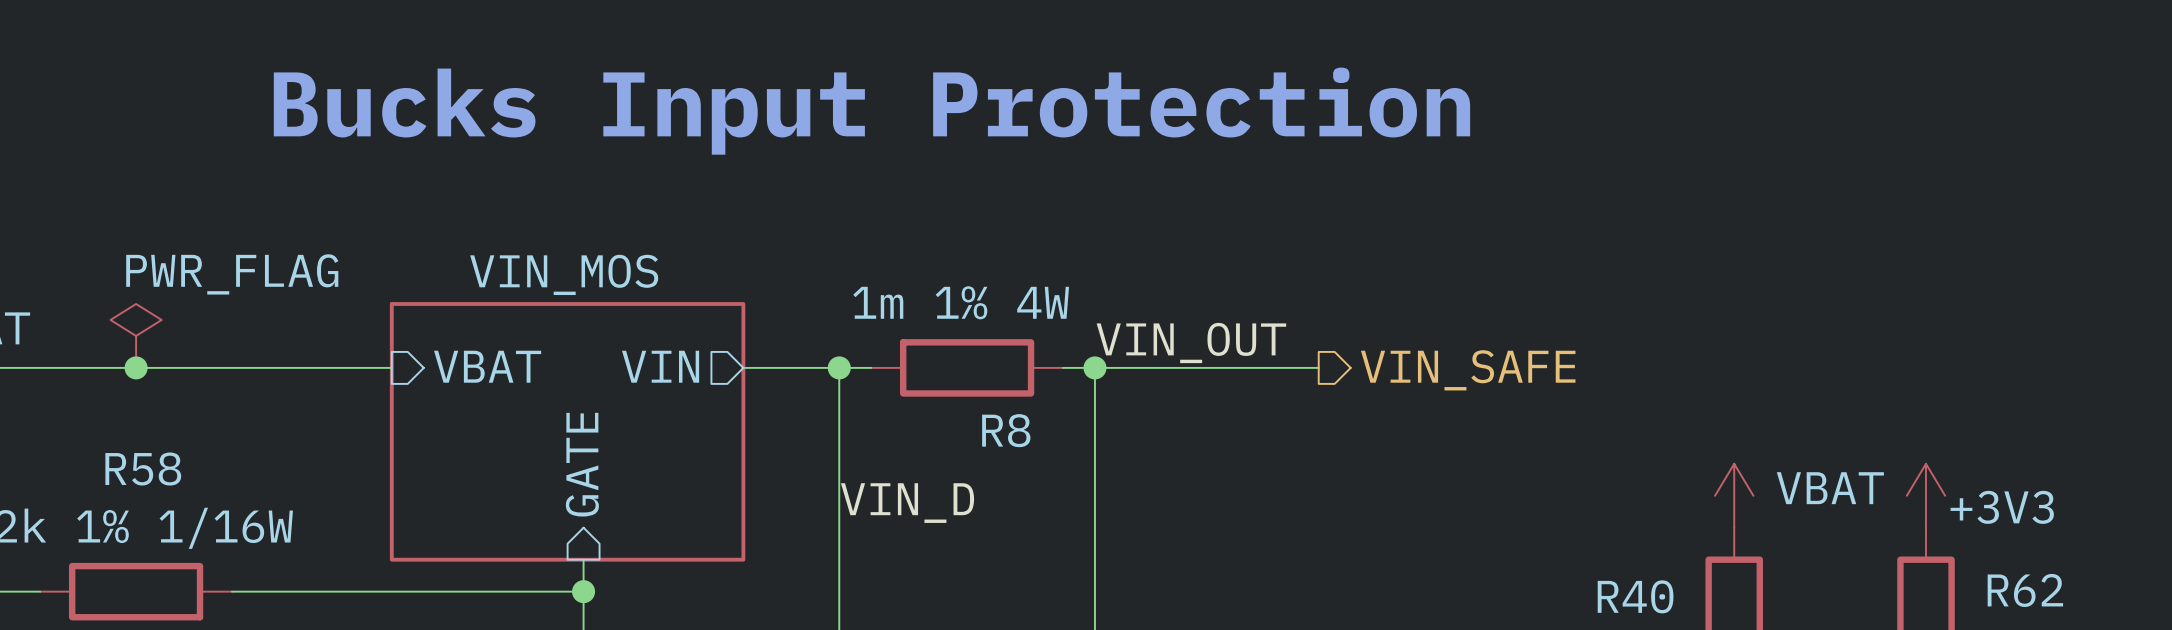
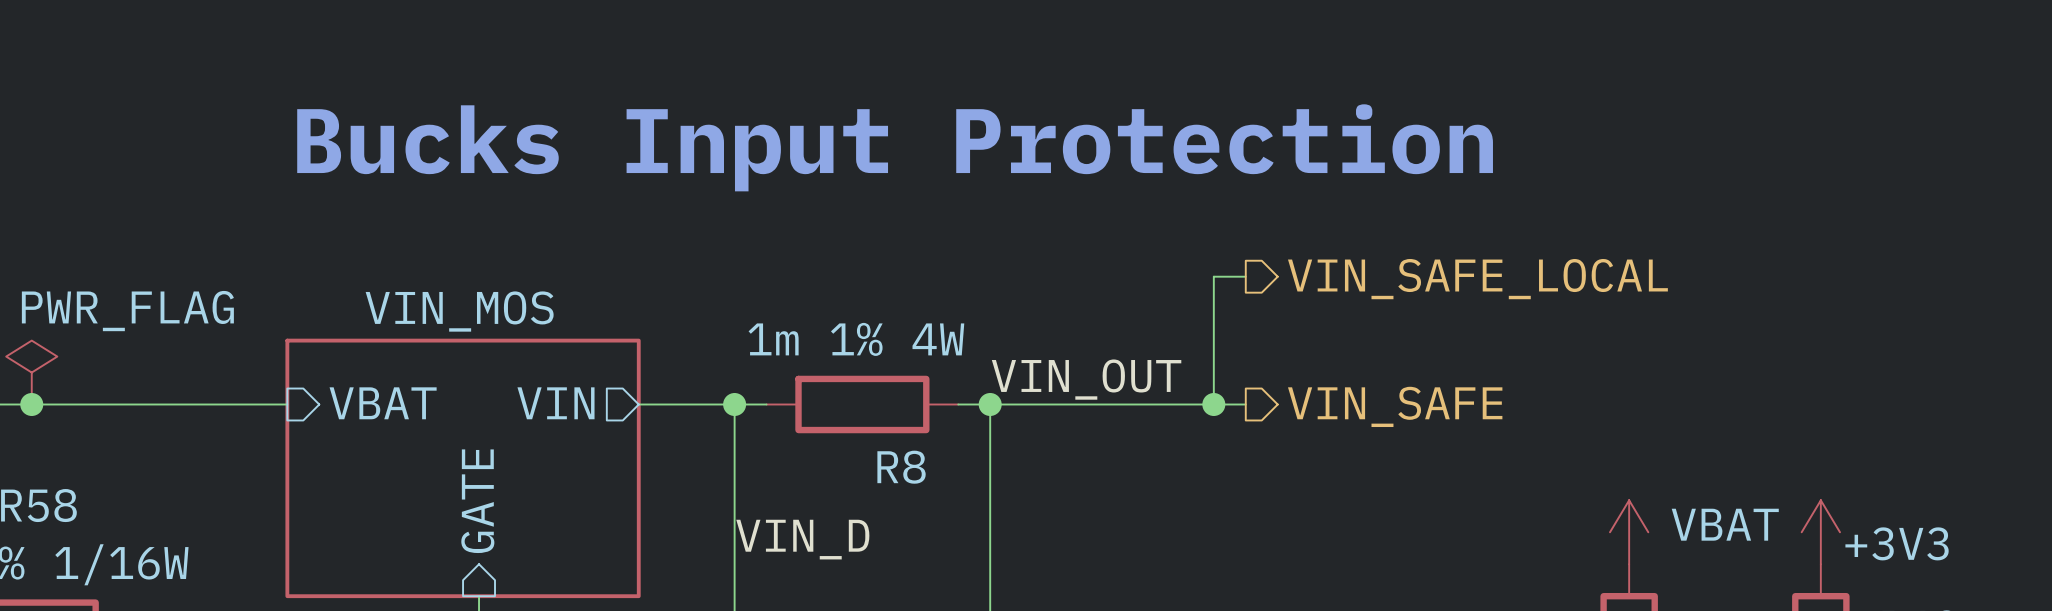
text position: Bucks Input Protection (871, 111) -> Bucks Input Protection (895, 147)
wire: none -> (1245, 276) (1213, 276) (1213, 404) (1245, 404)
hierarchical label: none -> VIN_SAFE_LOCAL (1477, 279)
junction: none -> (1213, 404)
hierarchical label position: VIN_SAFE (1468, 370) -> VIN_SAFE (1395, 406)

